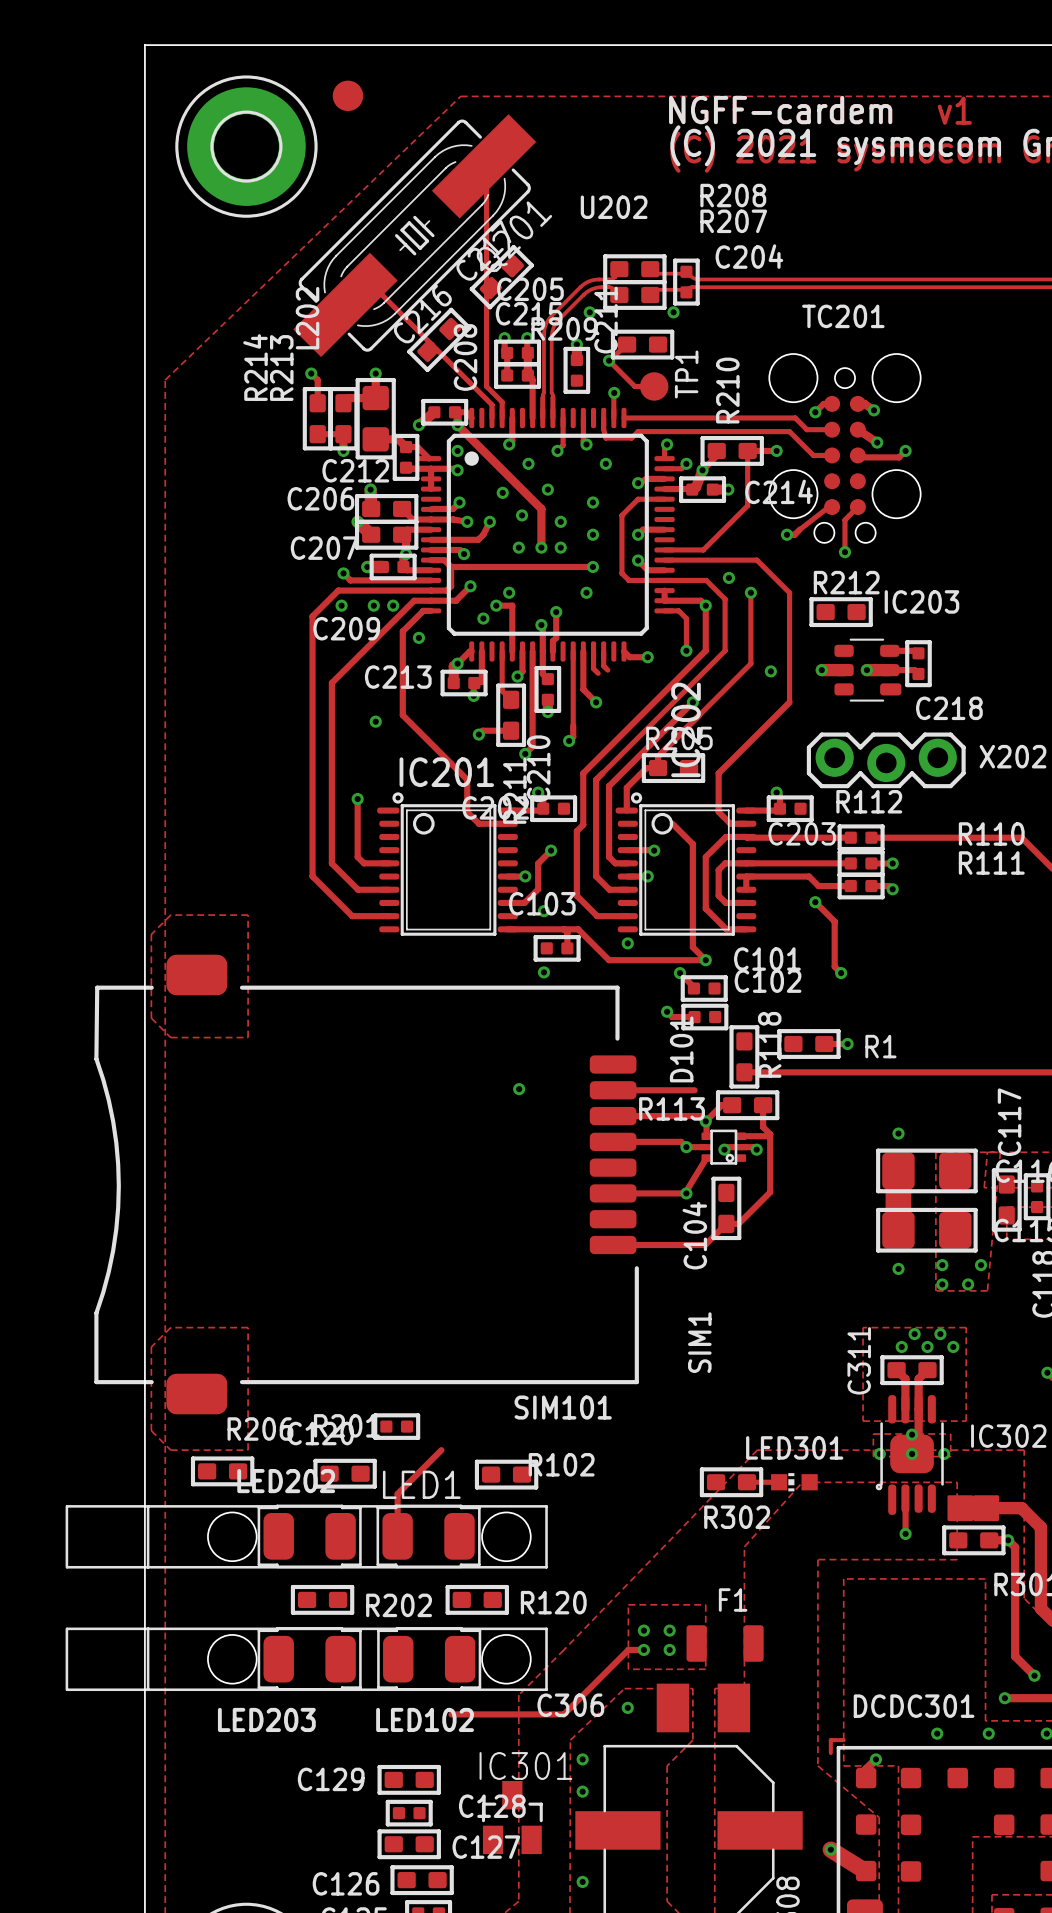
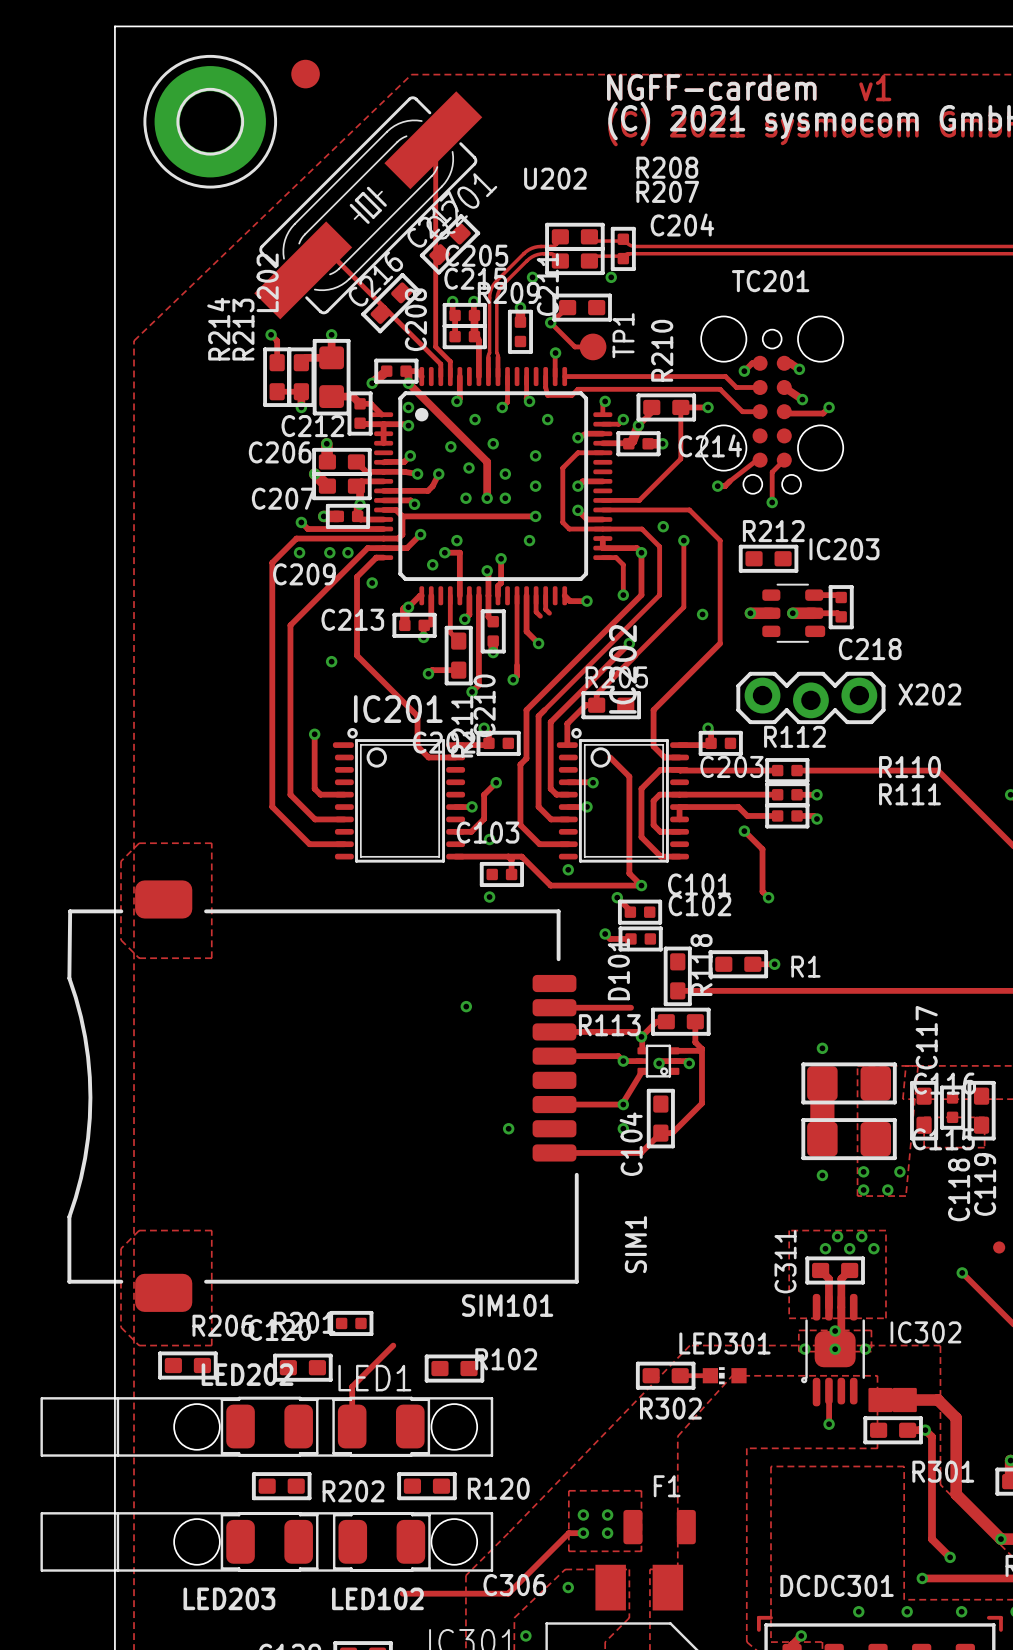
via: none -> (508, 1128)
via: none -> (623, 1128)

